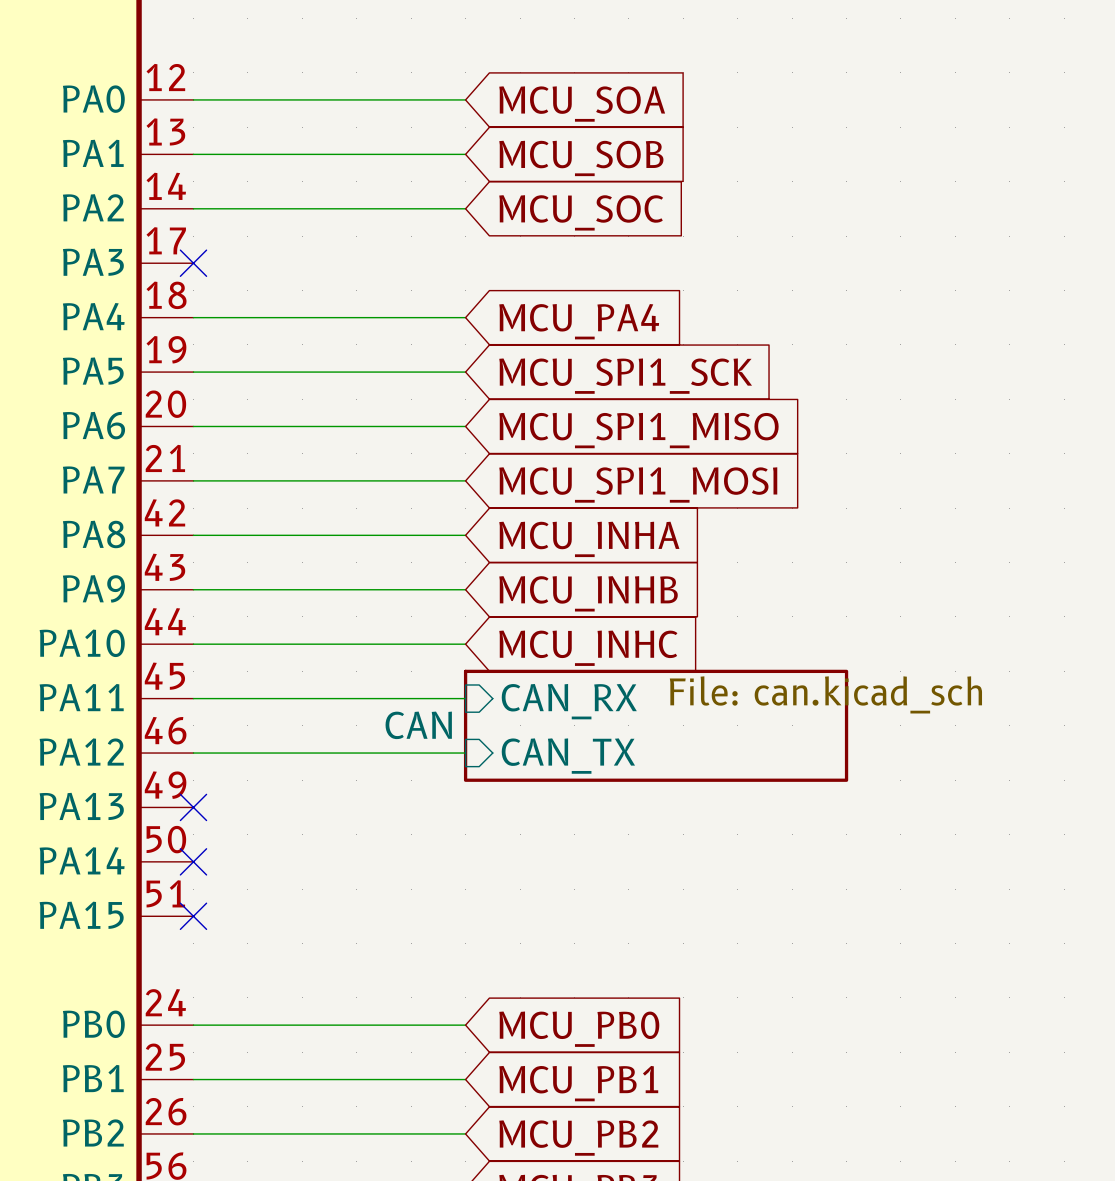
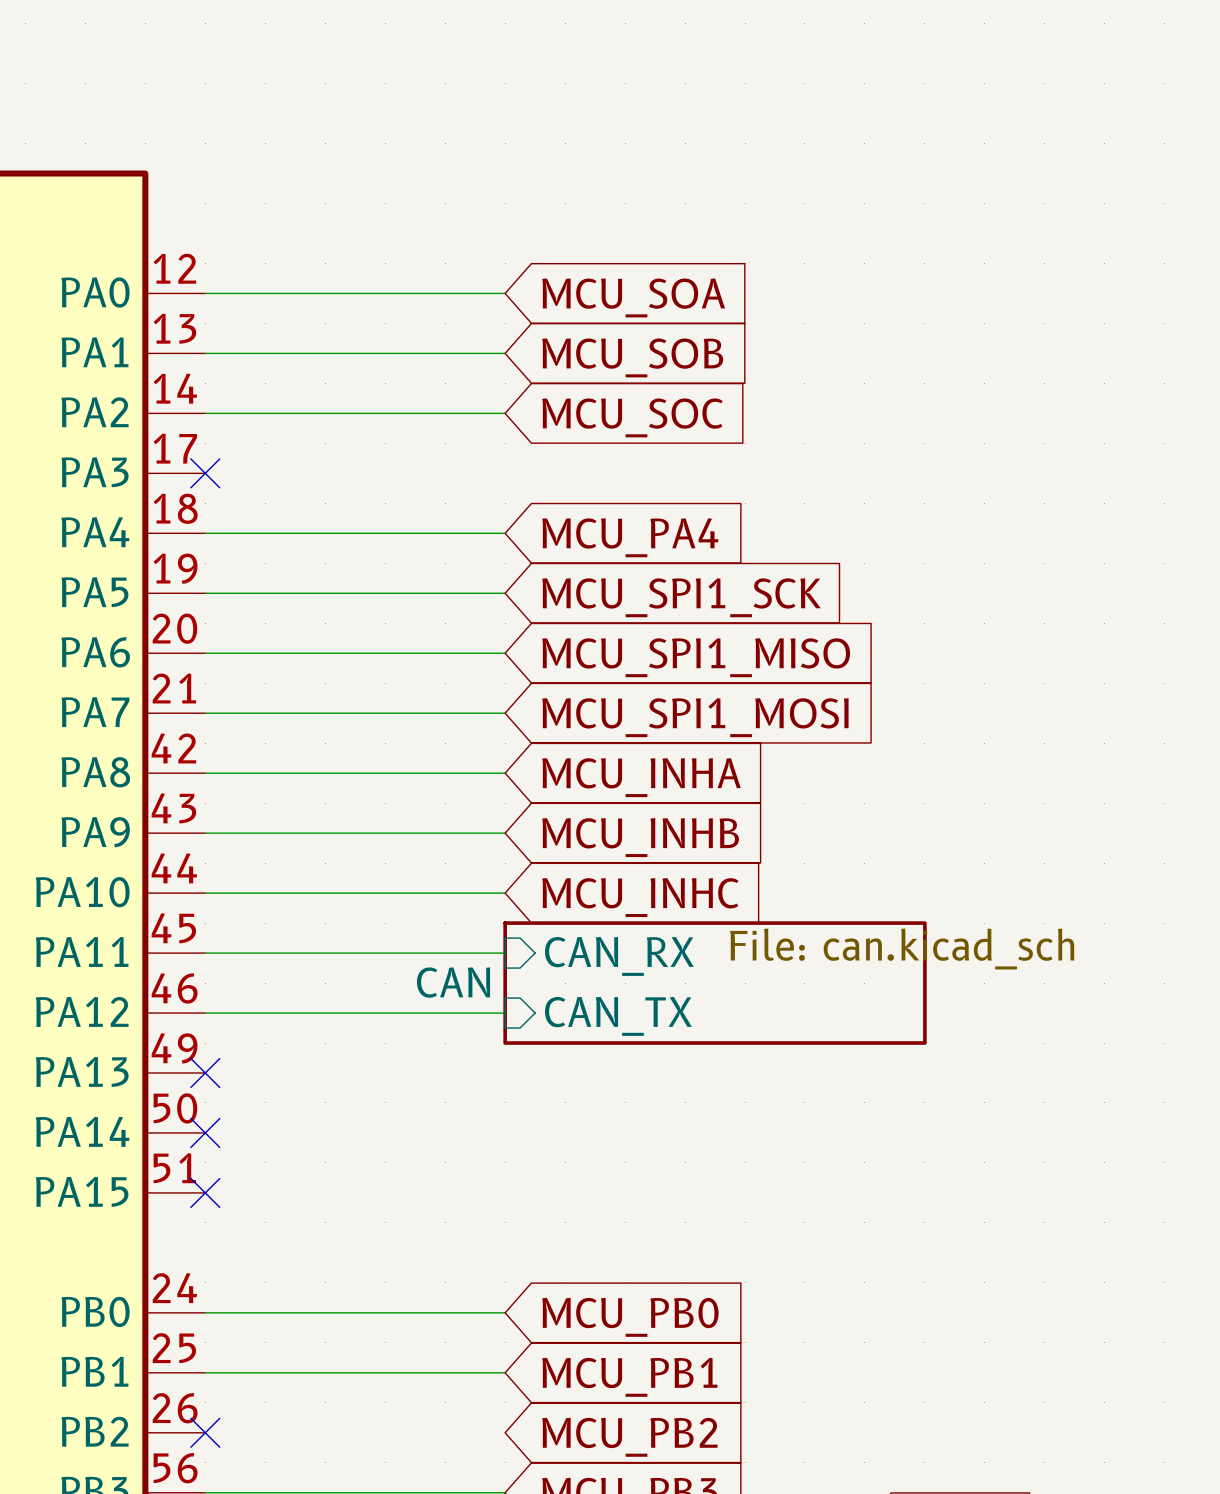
wire: (193, 1133) (465, 1133) -> none
no-connect mark: none -> (205, 1432)

